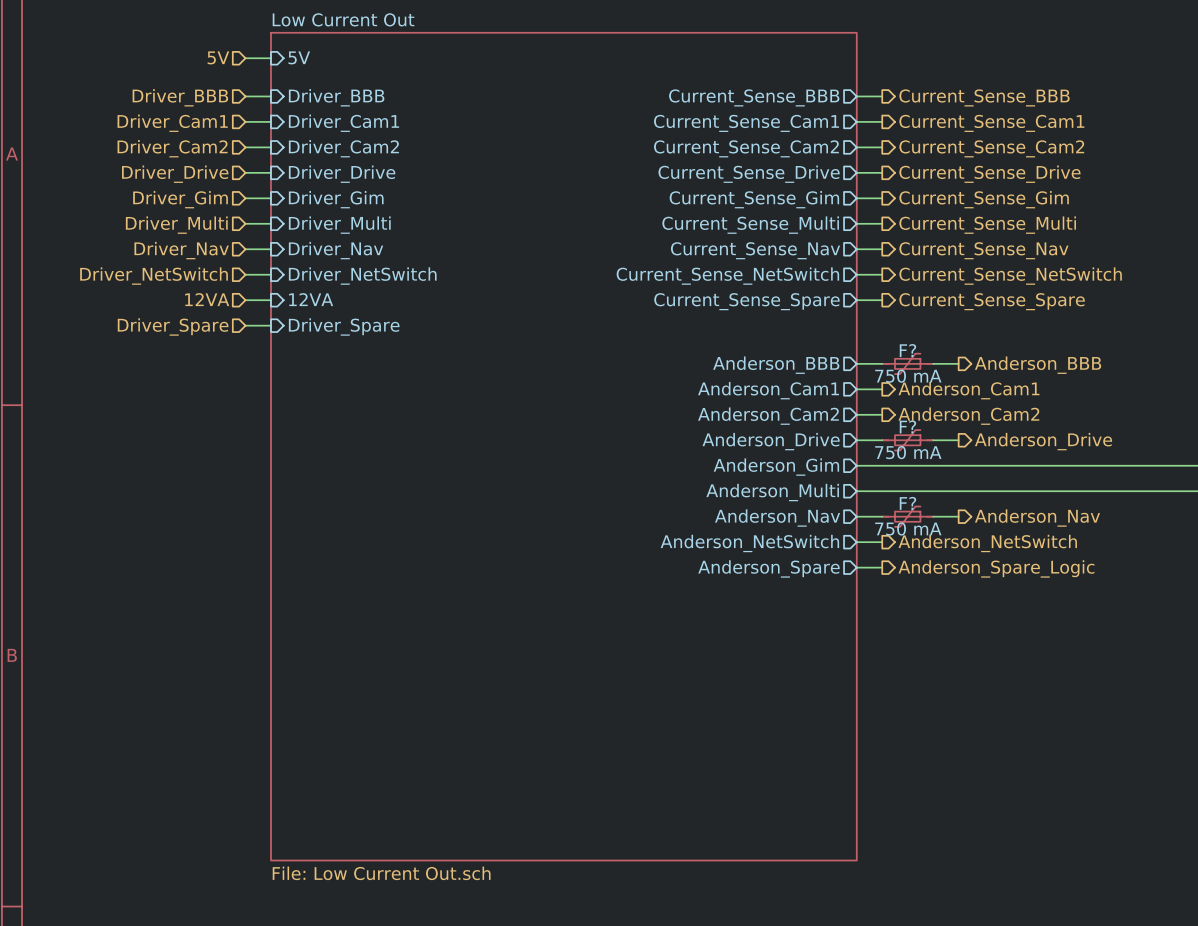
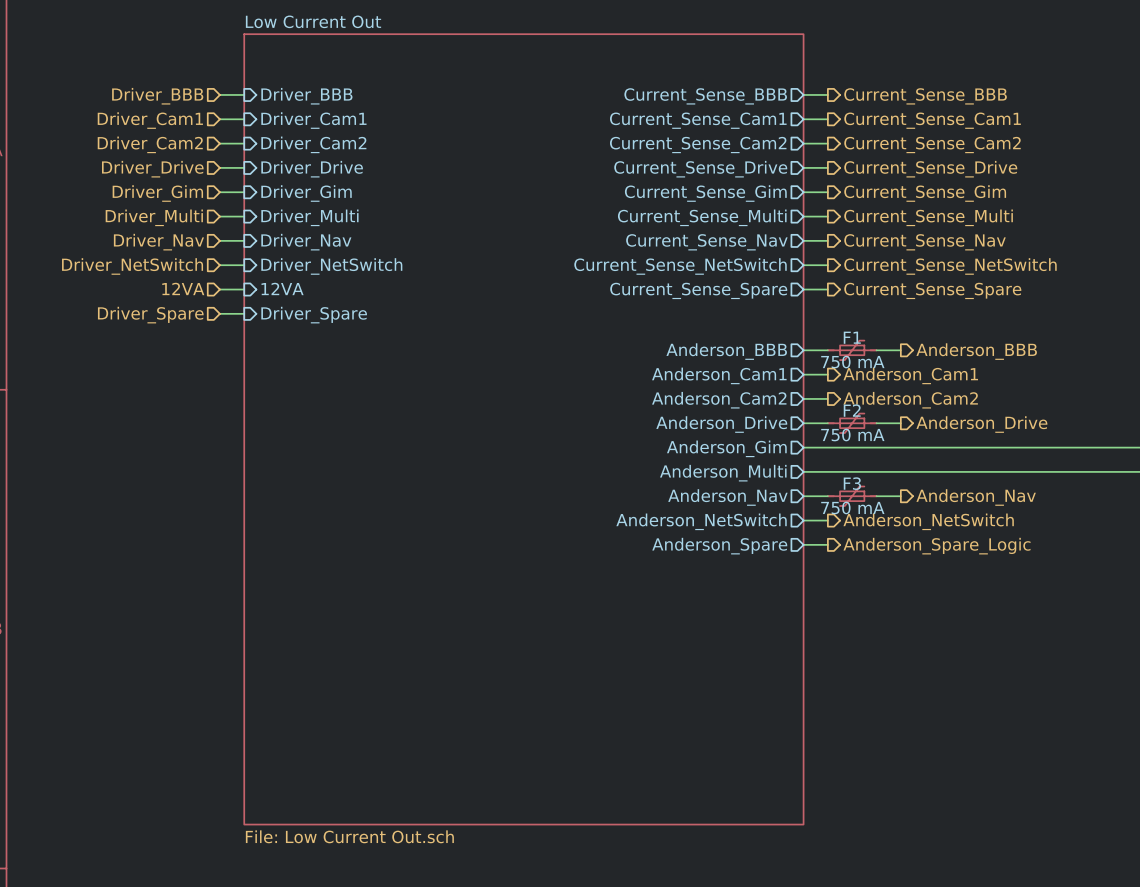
hierarchical label: 5V (218, 57) -> none
sheet pin: 5V (299, 57) -> none
wire: (245, 58) (270, 58) -> none
F? name: F? (907, 350) -> F1 (852, 337)
F? name: F? (907, 426) -> F2 (852, 410)
F? name: F? (907, 503) -> F3 (852, 483)

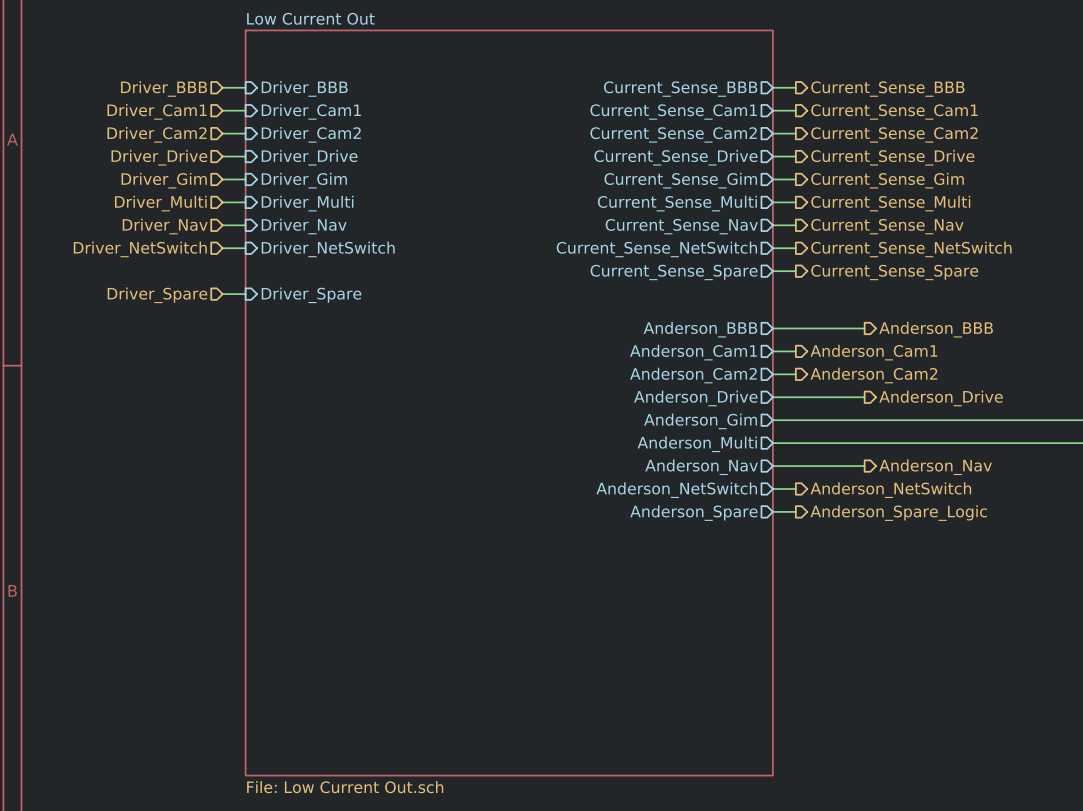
hierarchical label: 12VA (183, 288) -> none
sheet pin: 12VA (282, 288) -> none
wire: (219, 289) (244, 289) -> none
F1: 750 mA (852, 350) -> none
F2: 750 mA (852, 423) -> none
F3: 750 mA (852, 496) -> none

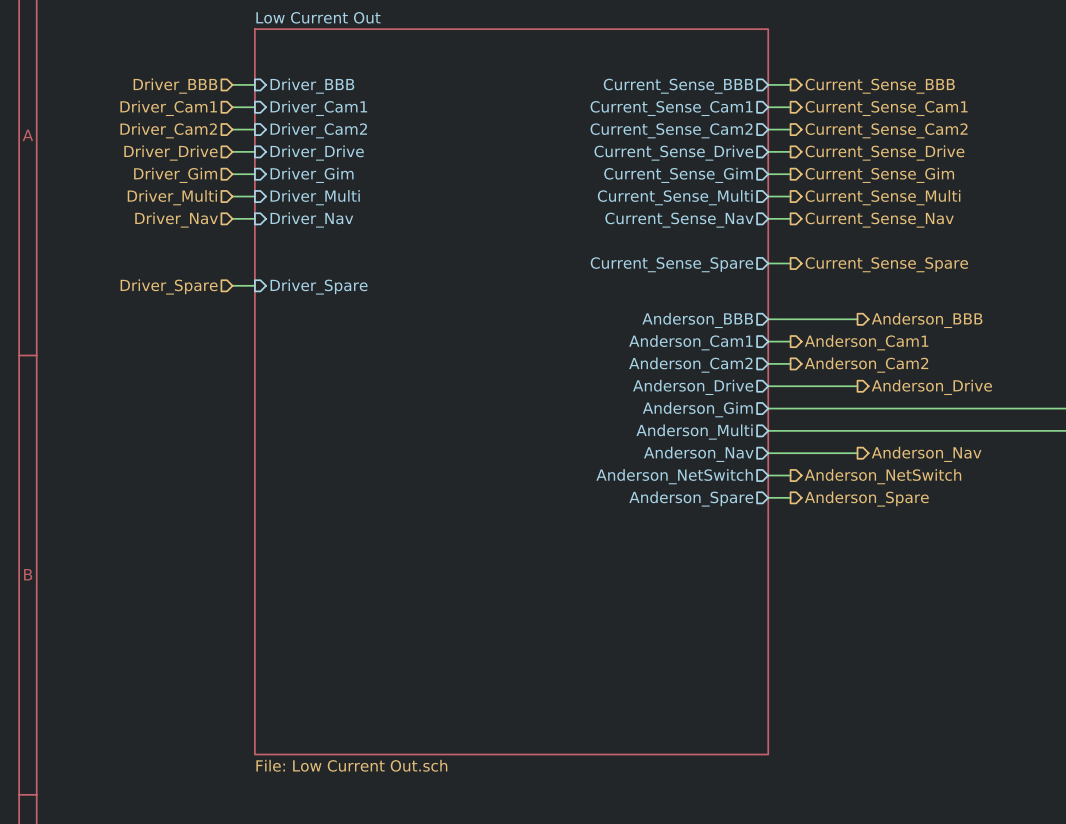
wire: (222, 248) (245, 248) -> none
wire: (772, 248) (795, 248) -> none
hierarchical label: Driver_NetSwitch (140, 249) -> none
sheet pin: Driver_NetSwitch (328, 249) -> none
sheet pin: Current_Sense_NetSwitch (656, 249) -> none
hierarchical label: Current_Sense_NetSwitch (911, 249) -> none
hierarchical label: Anderson_Spare_Logic (898, 513) -> Anderson_Spare (866, 498)

